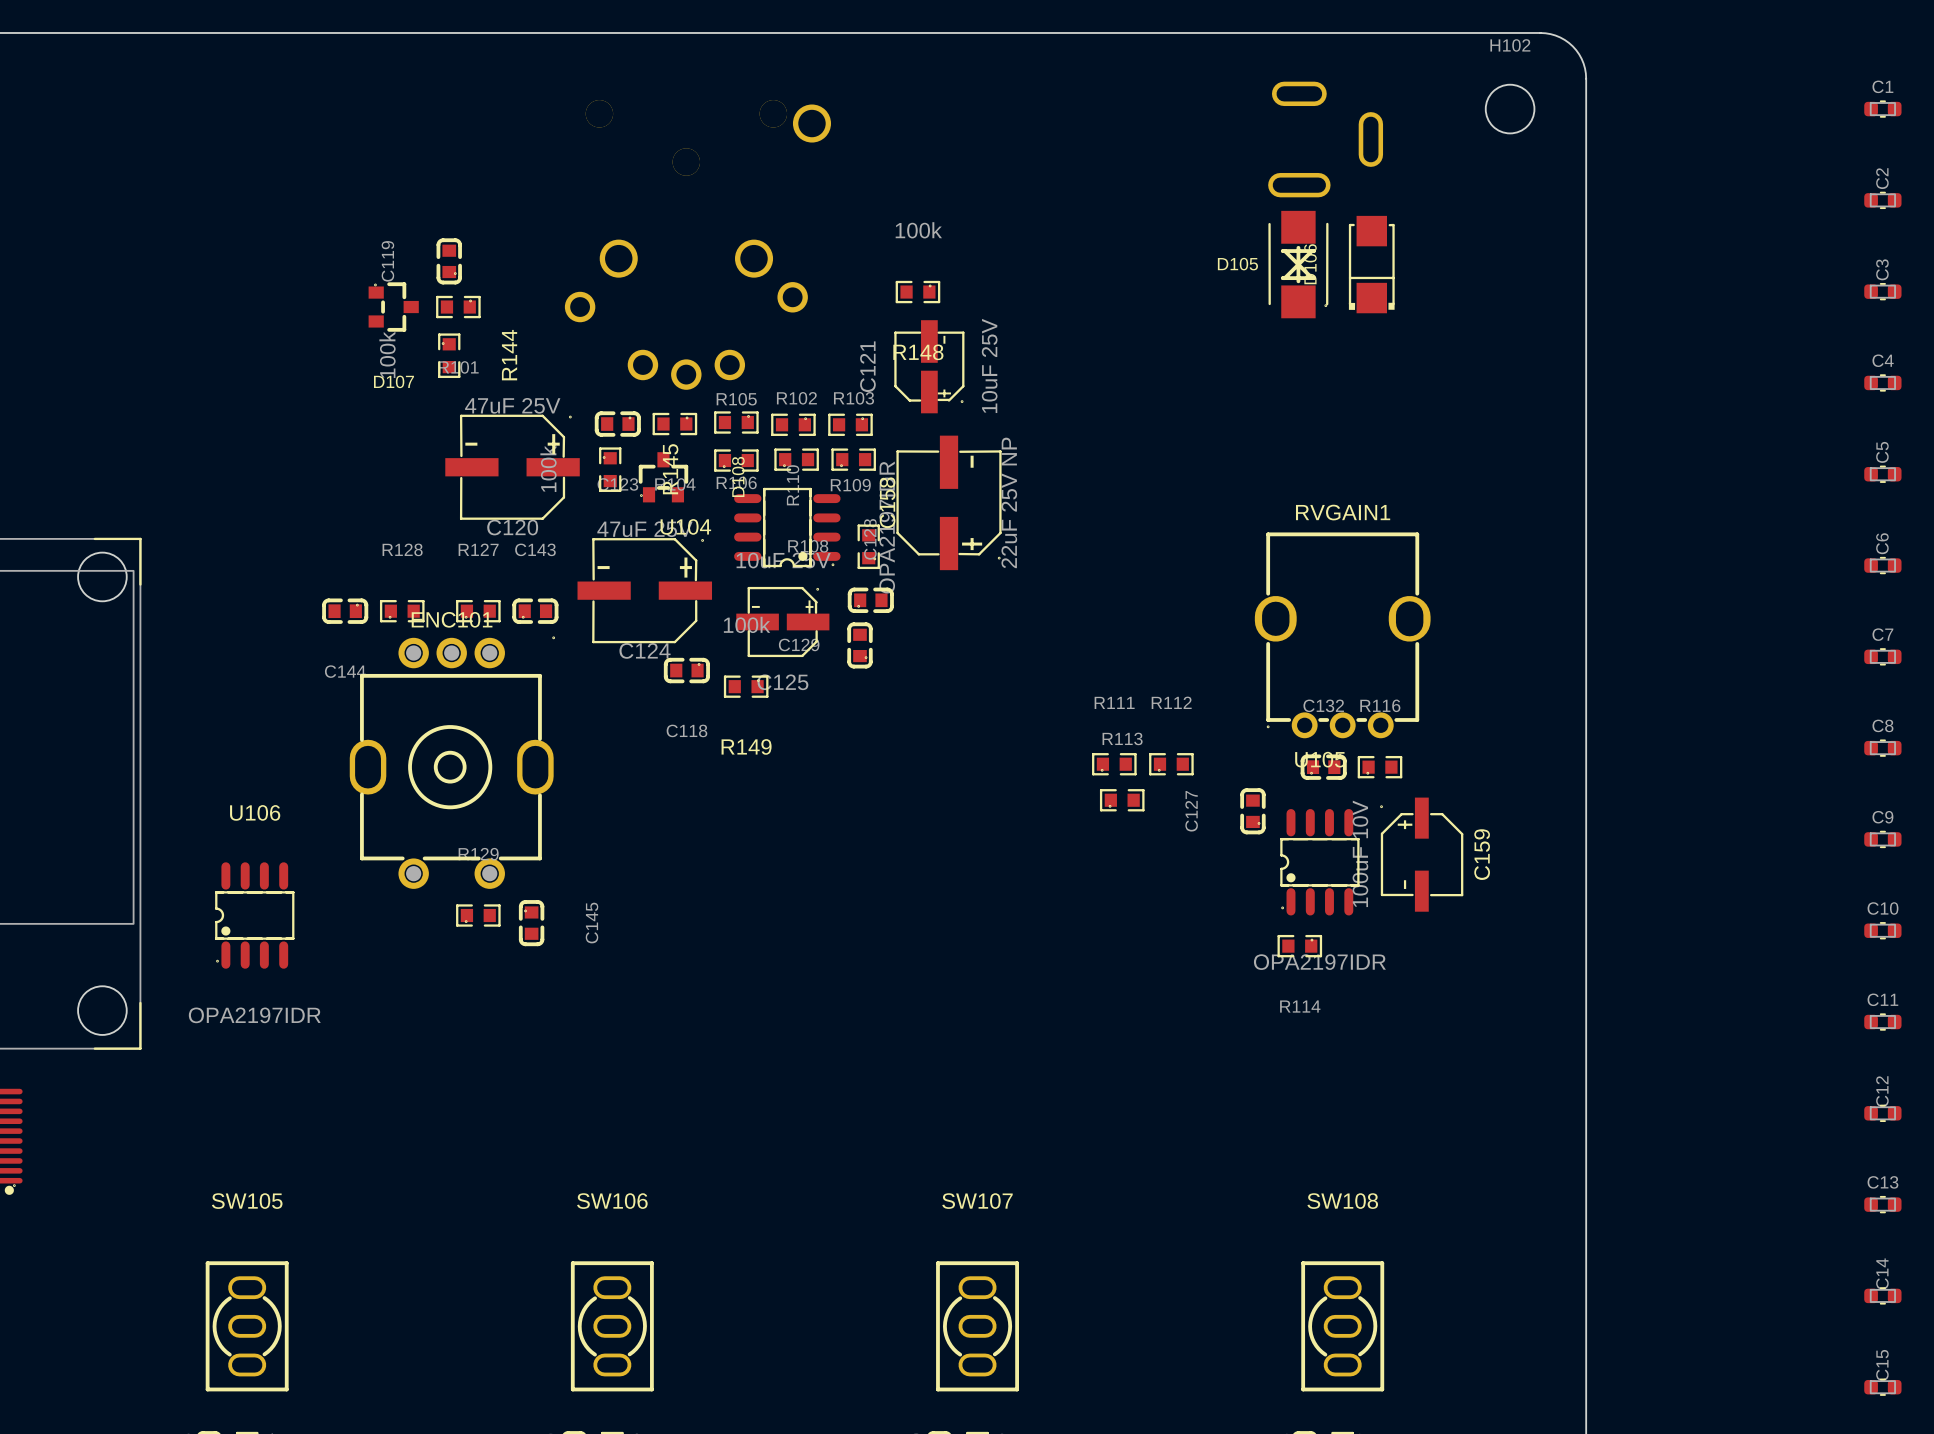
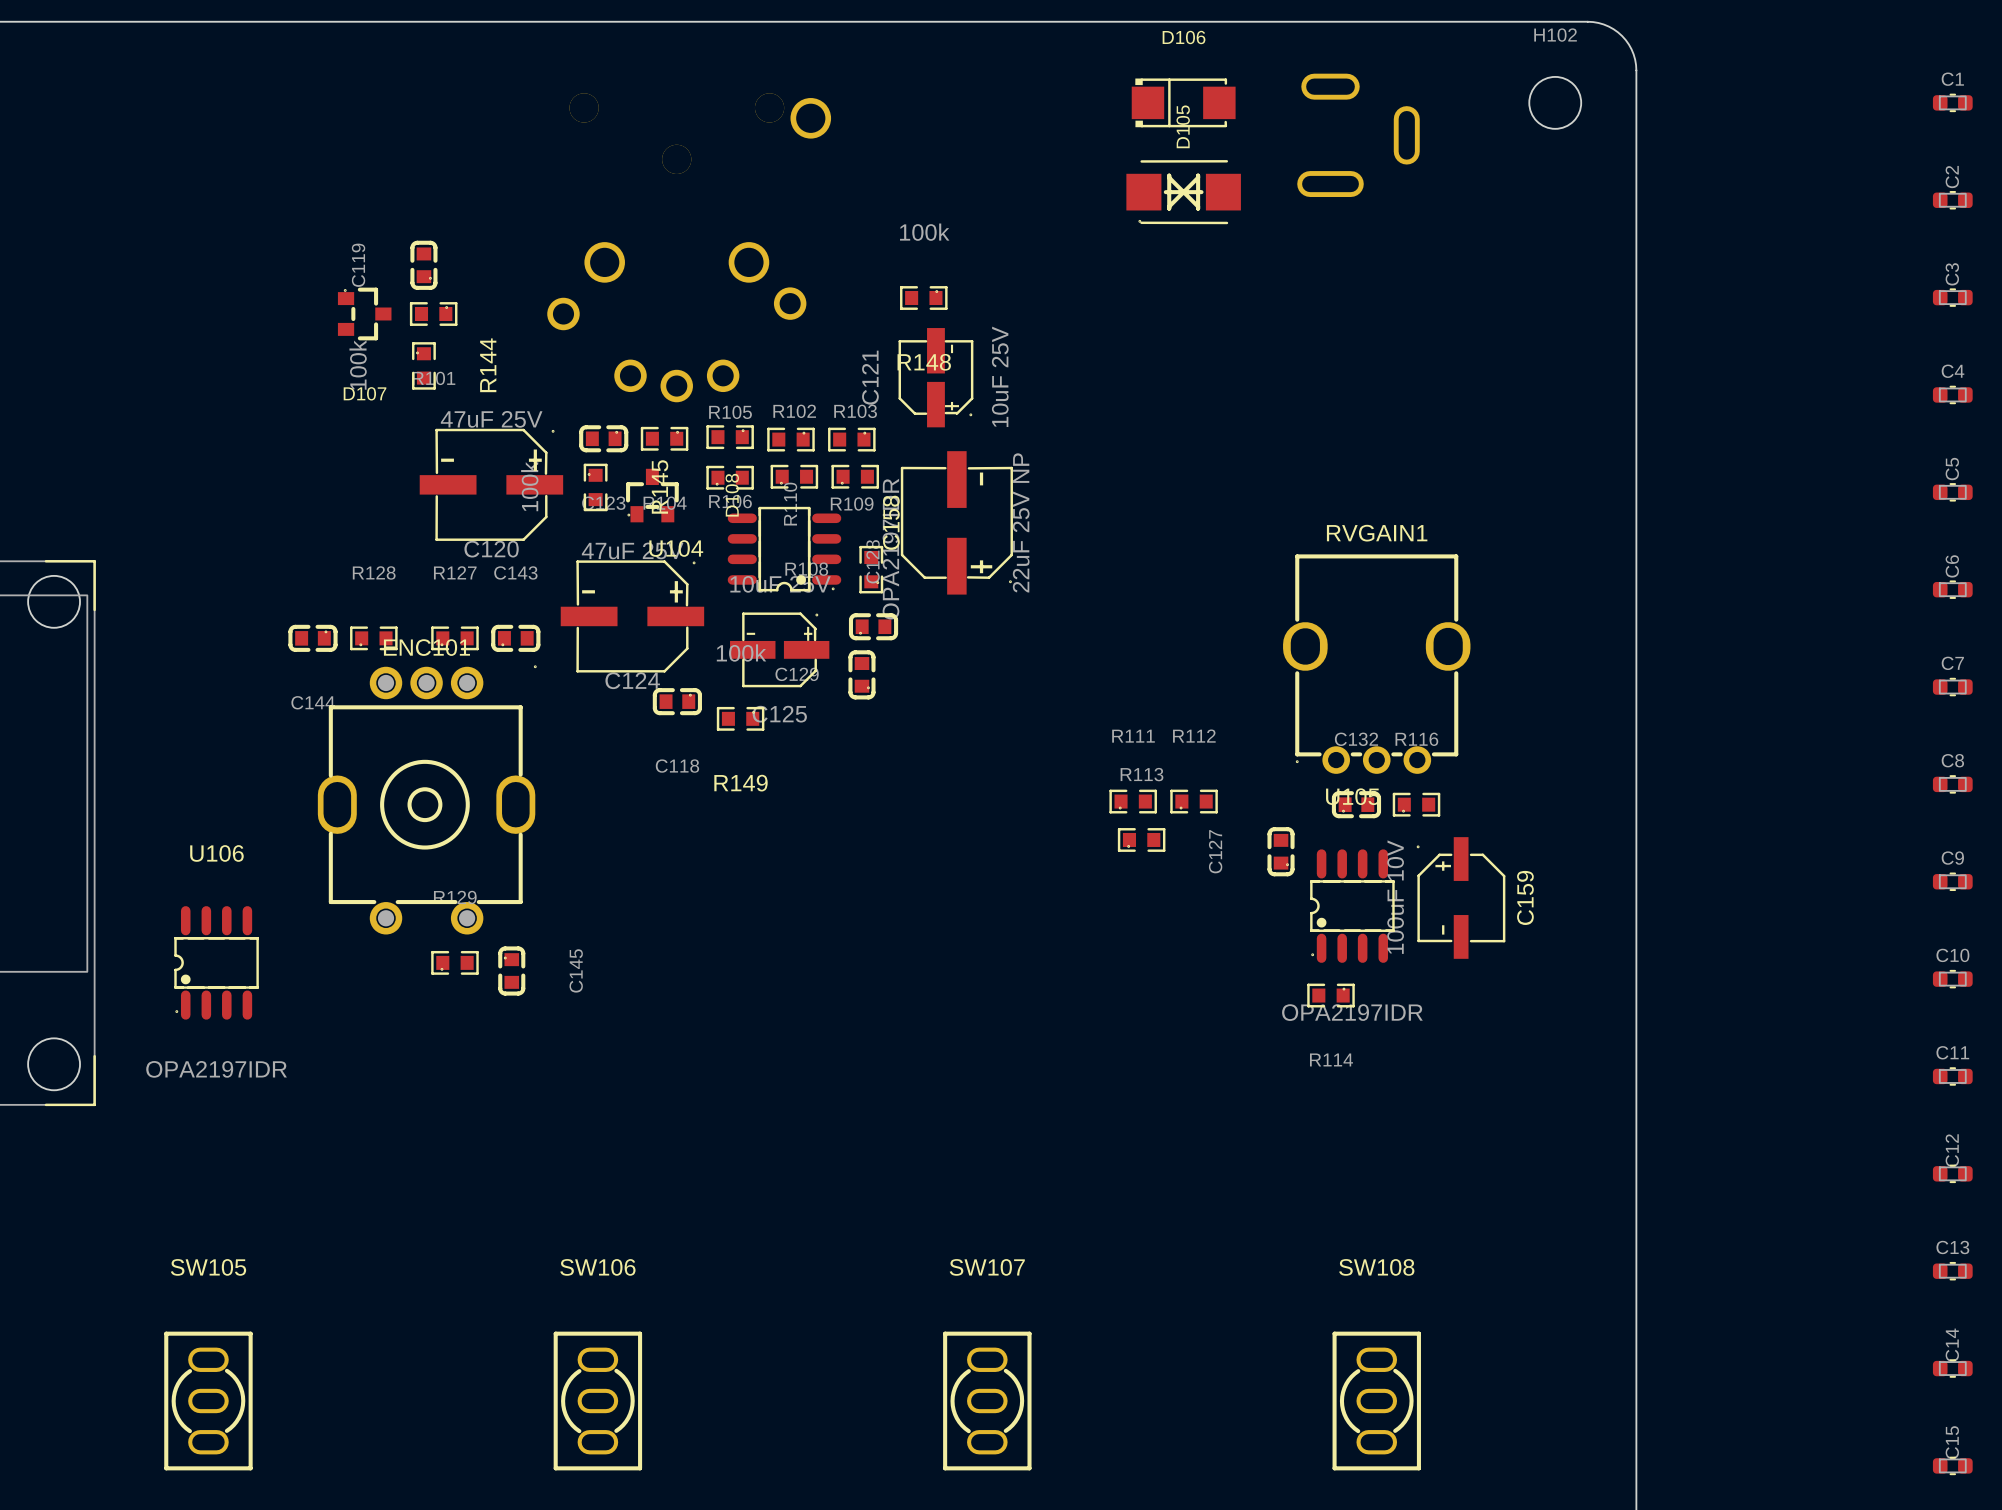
D105 rotation: 0° (1298, 264) -> 90° clockwise (1183, 192)
D105 position: (1298, 264) -> (1183, 192)
D106 rotation: 0° (1371, 264) -> 90° clockwise (1183, 102)
D106 position: (1371, 264) -> (1183, 102)

